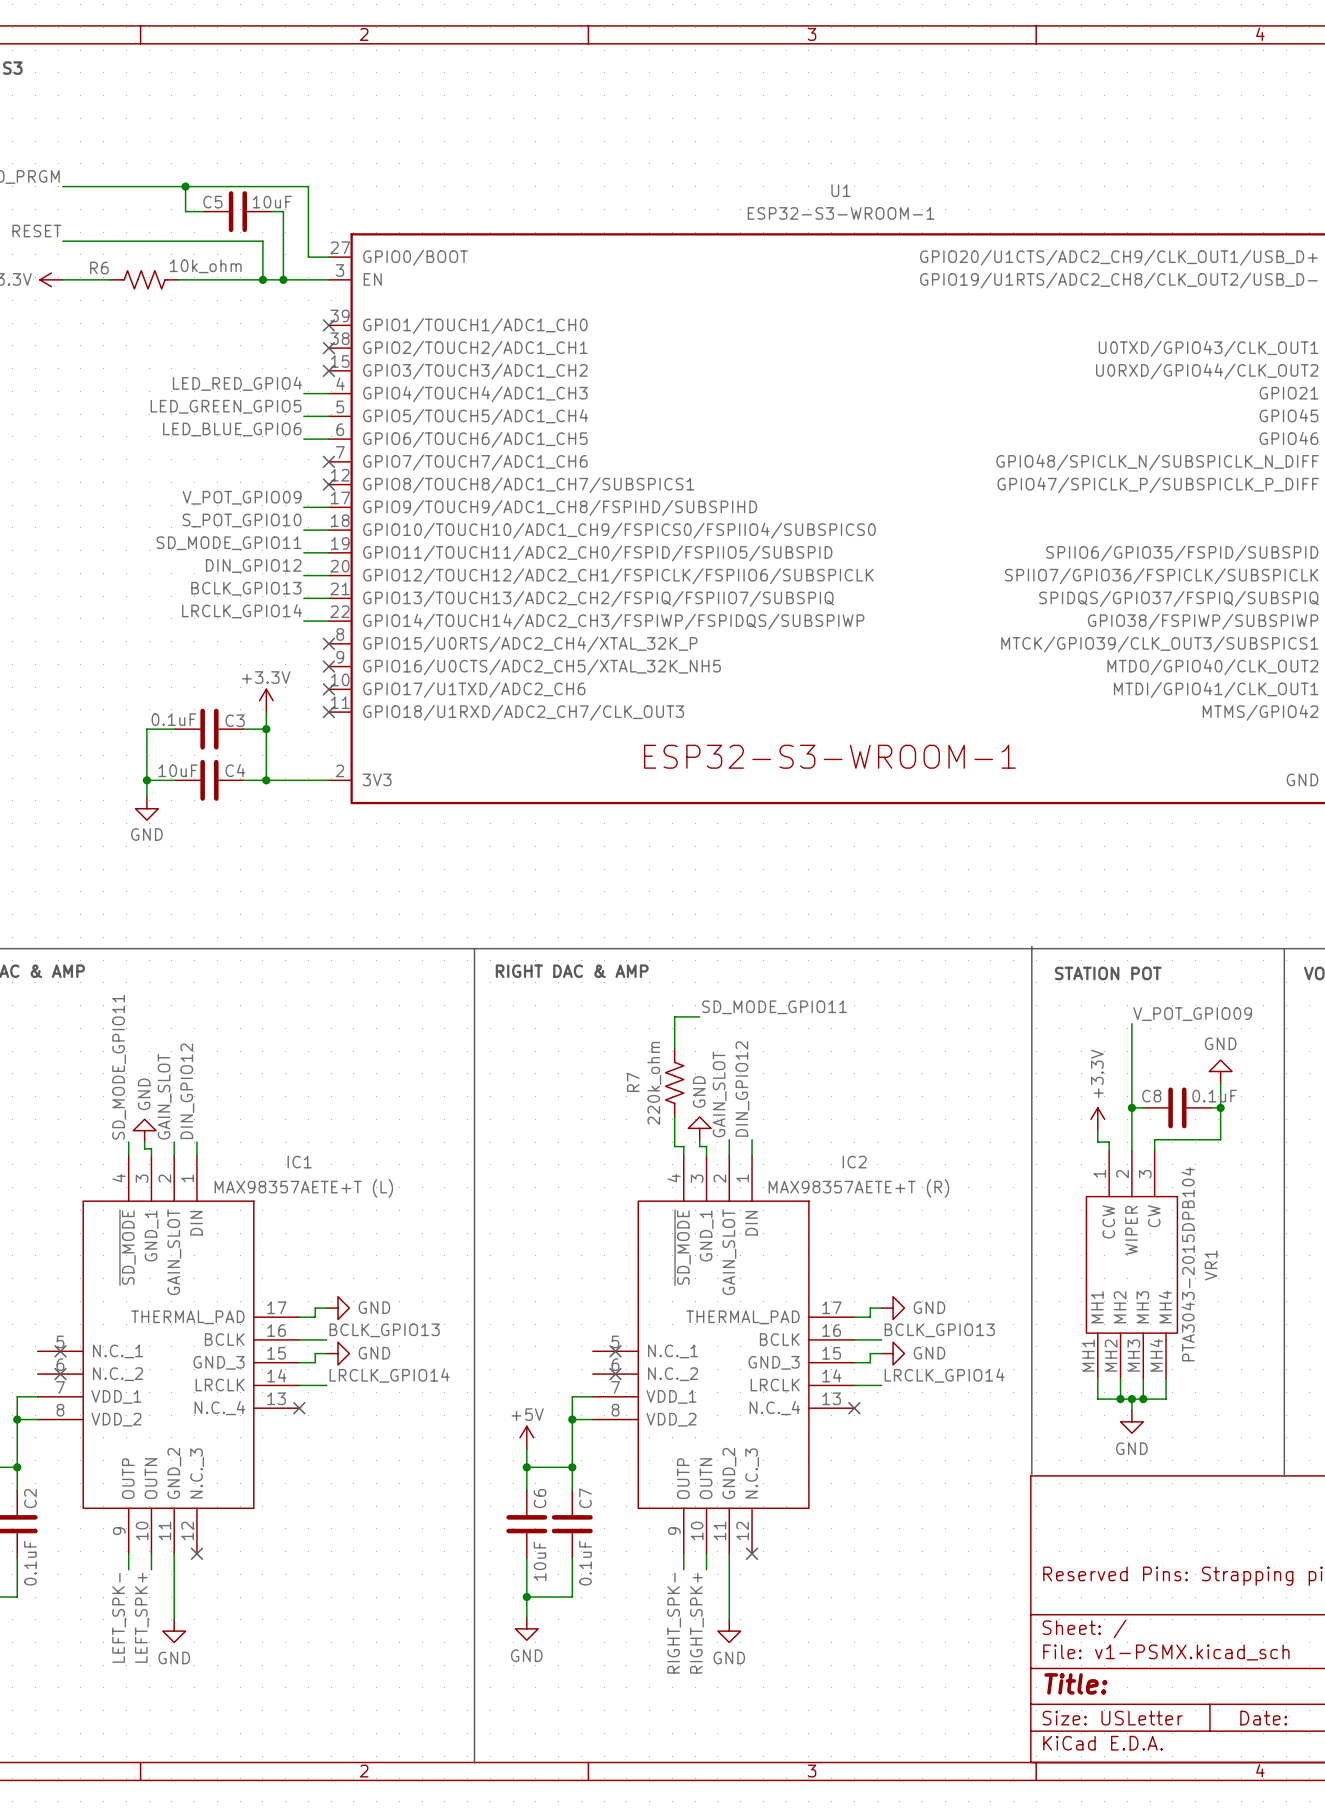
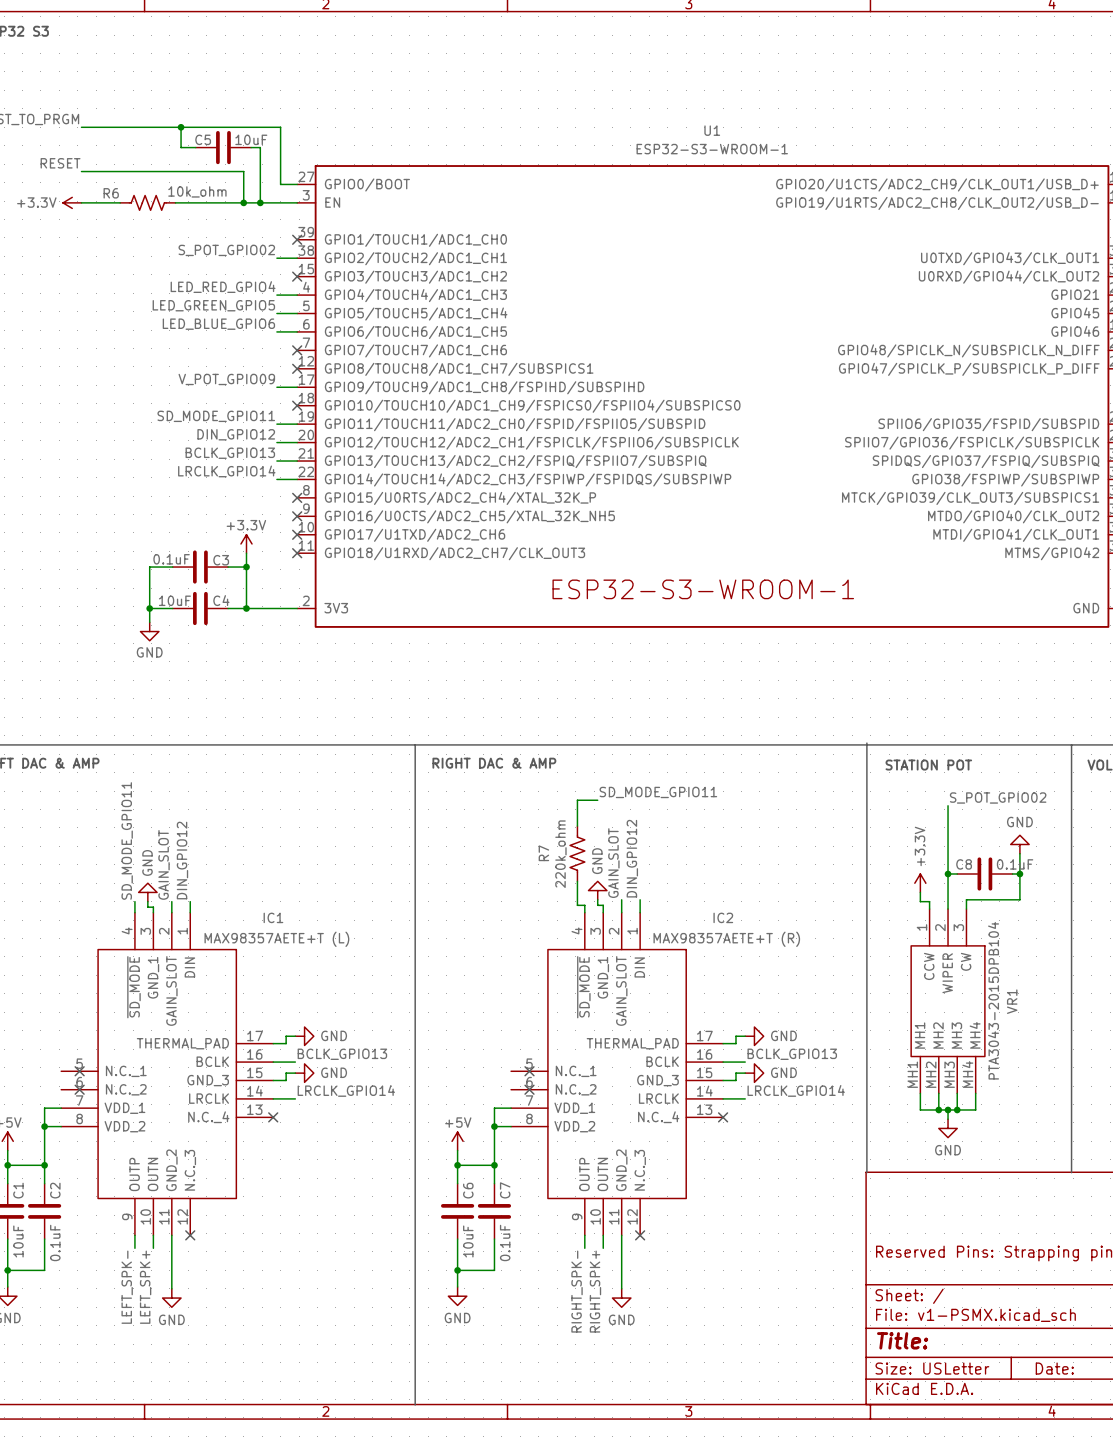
label: none -> S_POT_GPIO02 (226, 250)
no-connect mark: (328, 348) -> none
label: S_POT_GPIO10 (242, 520) -> none
wire: (303, 530) (328, 530) -> (276, 258) (297, 258)
no-connect mark: none -> (297, 405)
label: V_POT_GPIO09 (1192, 1014) -> S_POT_GPIO02 (998, 797)

